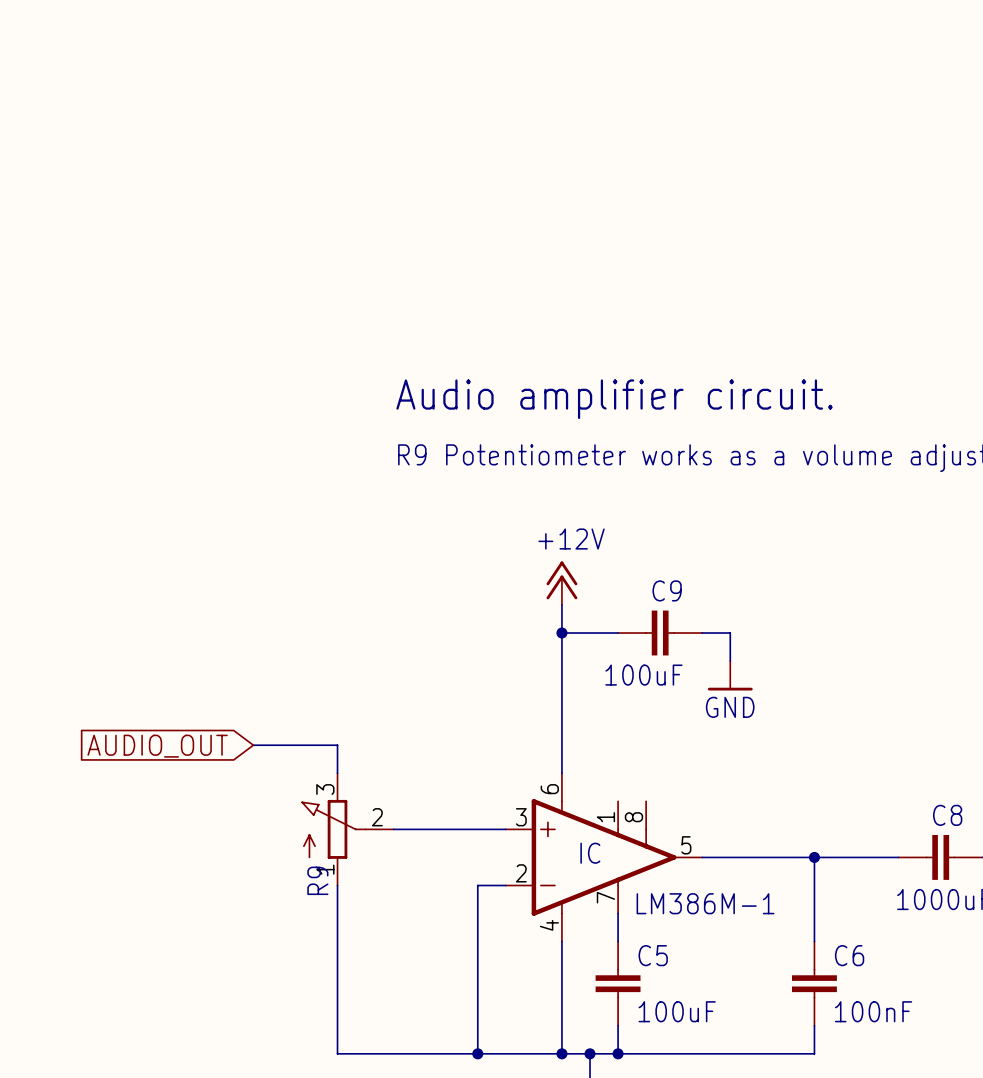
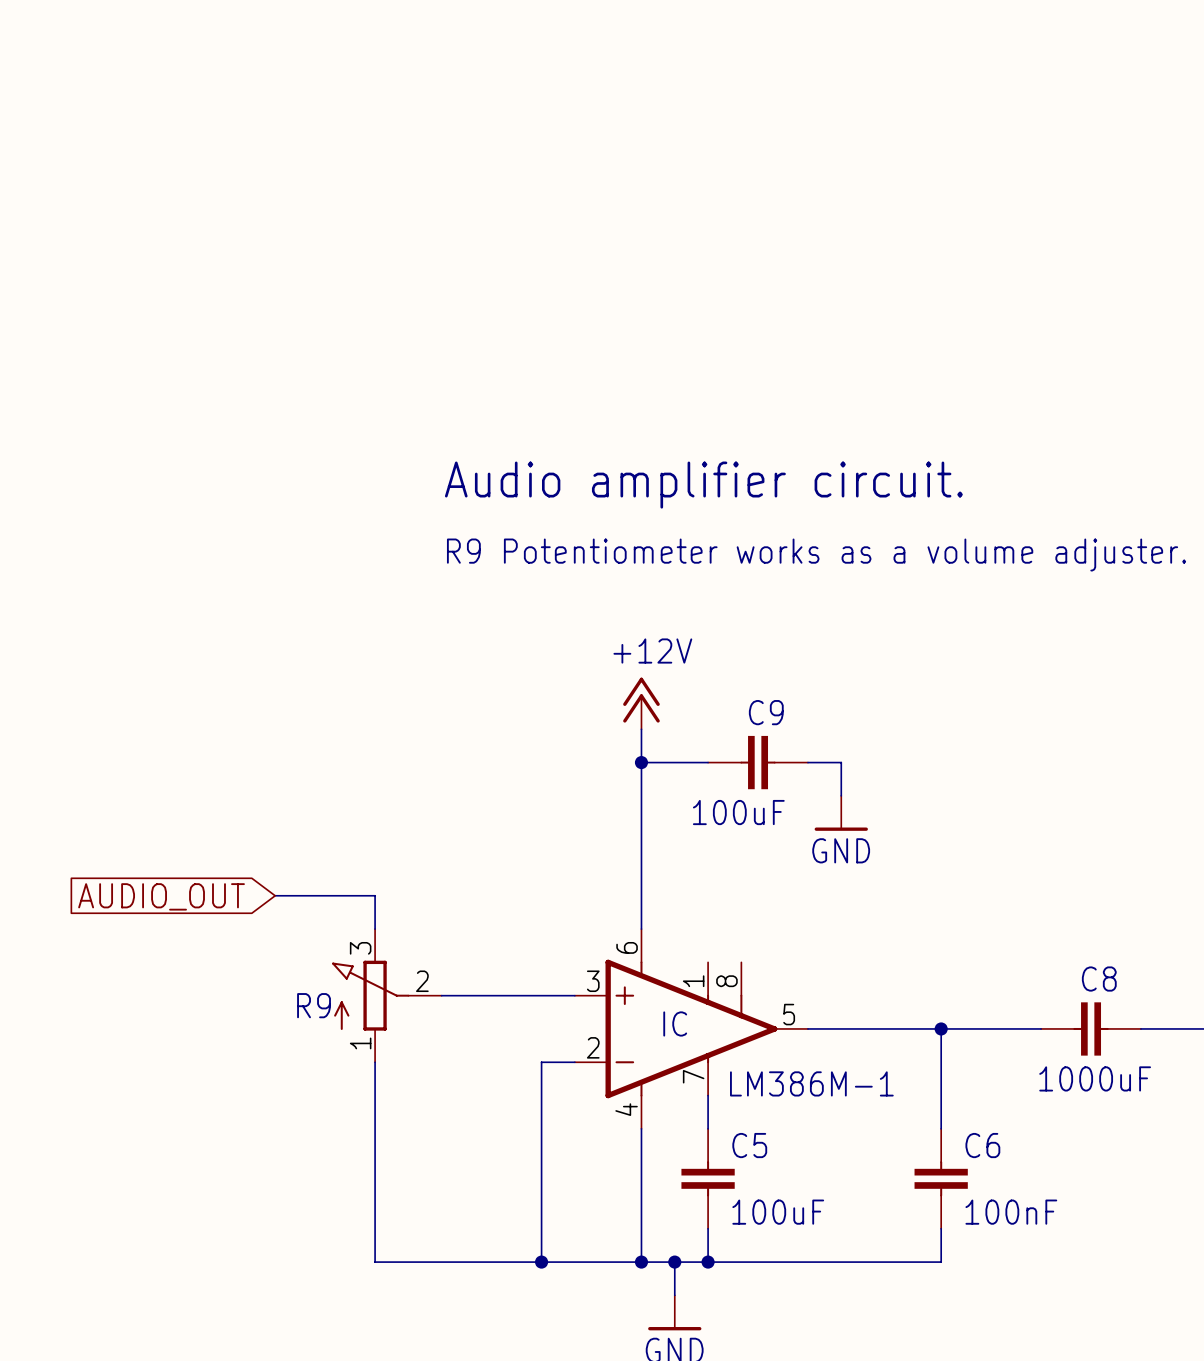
R9 name rotation: 0° (317, 880) -> 90° clockwise (314, 1005)
R9 name position: R9 (317, 880) -> R9 (314, 1005)

